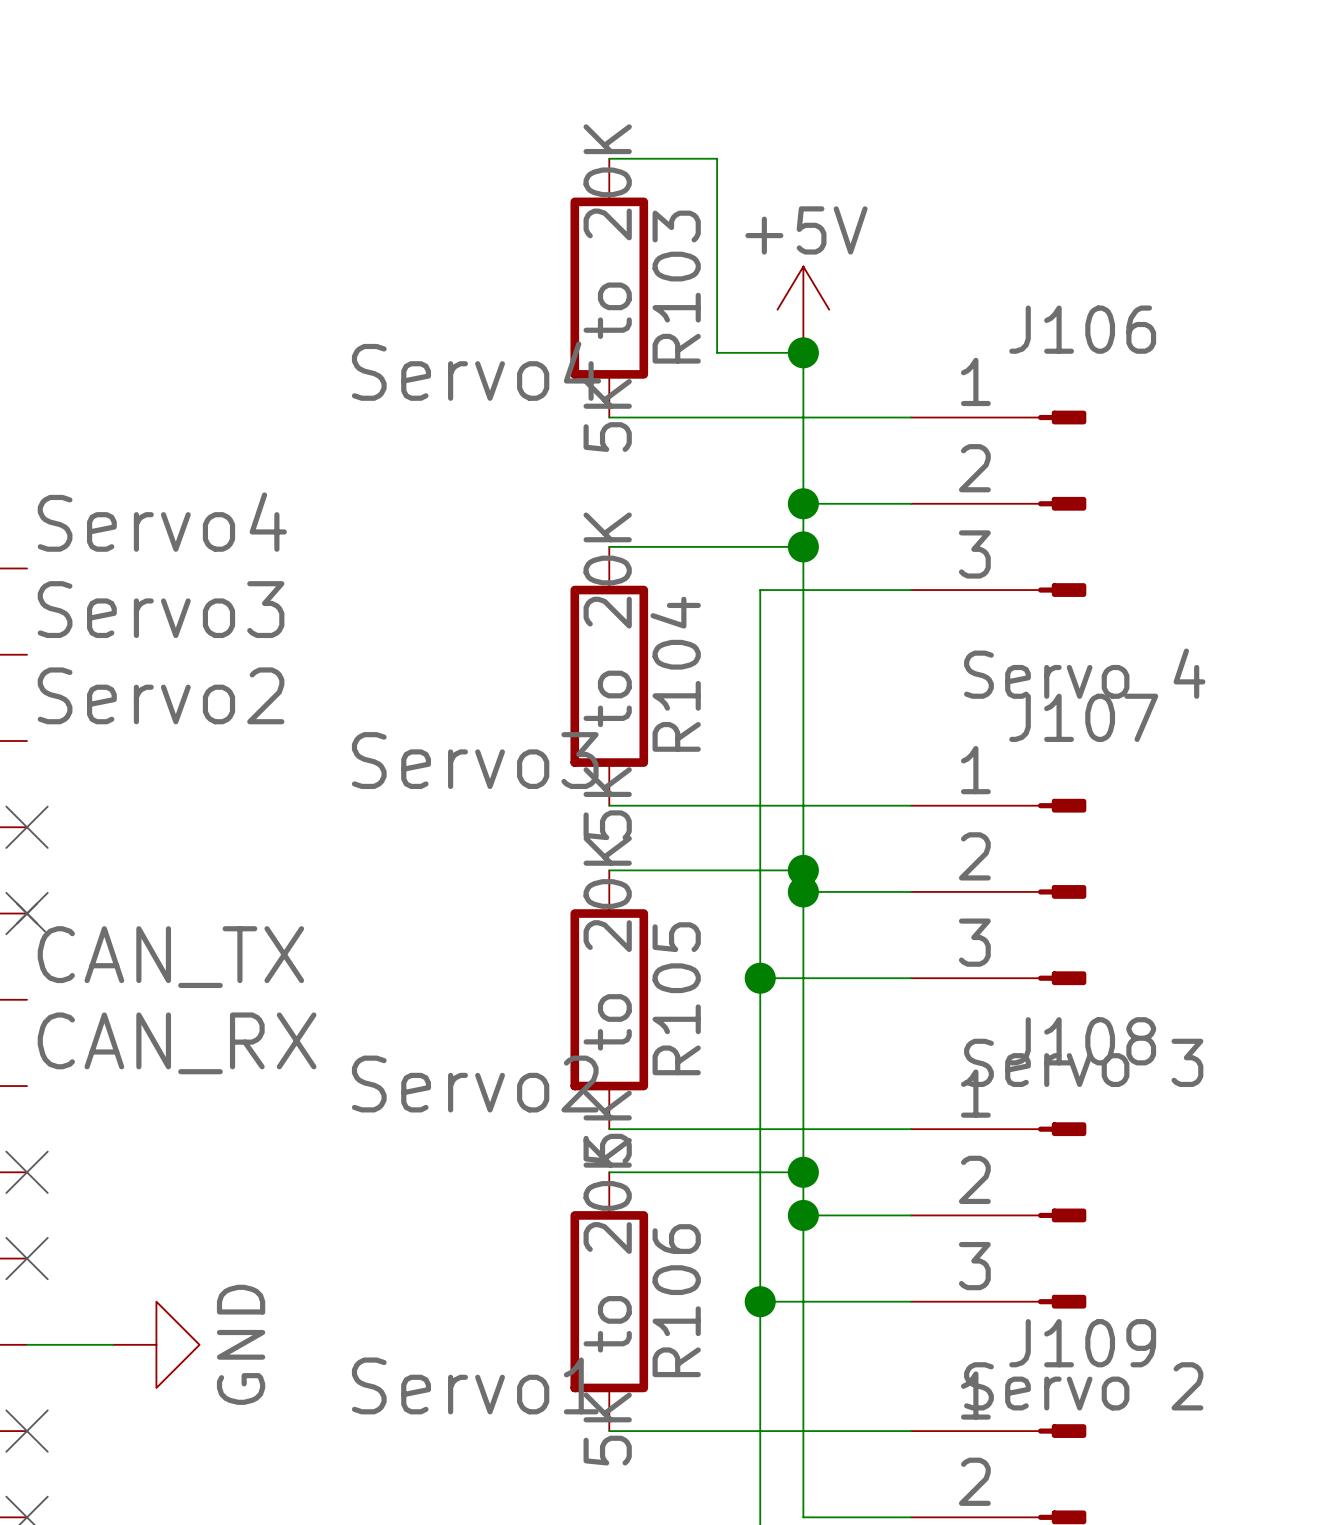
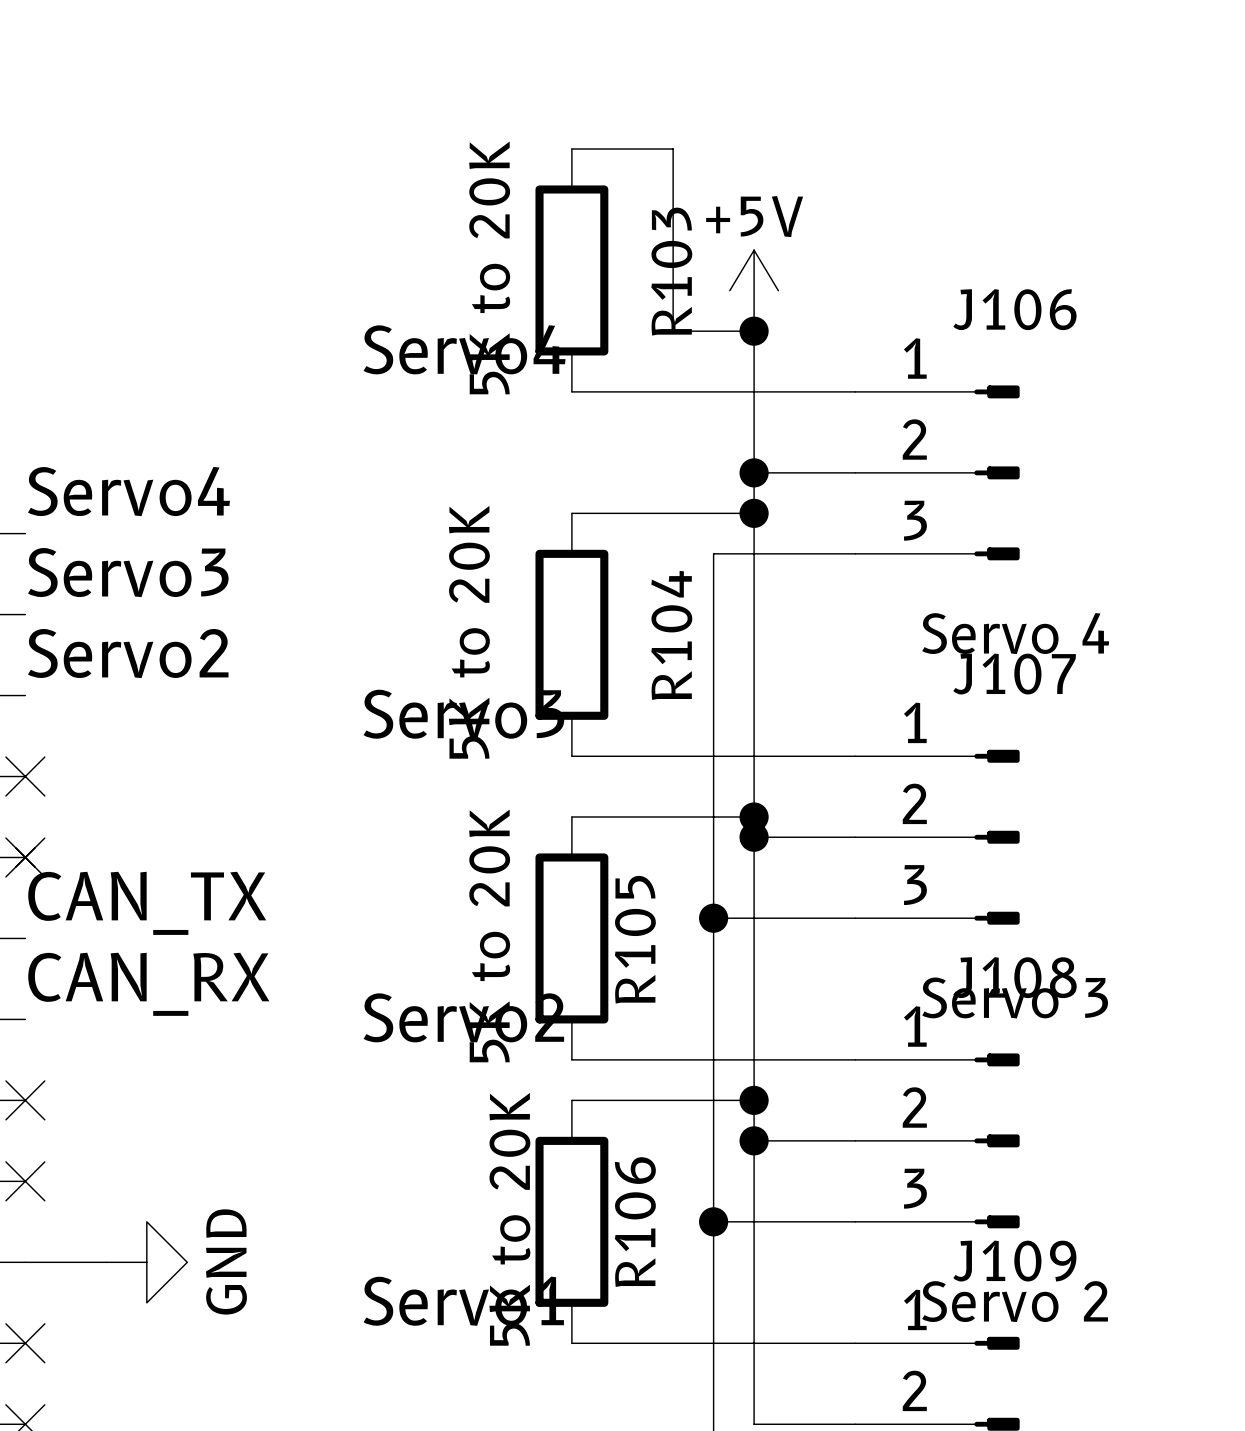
R103 name position: R103 (676, 287) -> R103 (671, 271)
R103 value position: 5K to 20K (607, 288) -> 5K to 20K (489, 267)
R104 name position: R104 (675, 674) -> R104 (671, 635)
R104 value position: 5K to 20K (607, 676) -> 5K to 20K (469, 632)
R105 value position: 5K to 20K (607, 999) -> 5K to 20K (489, 935)
R106 value position: 5K to 20K (607, 1301) -> 5K to 20K (509, 1219)

